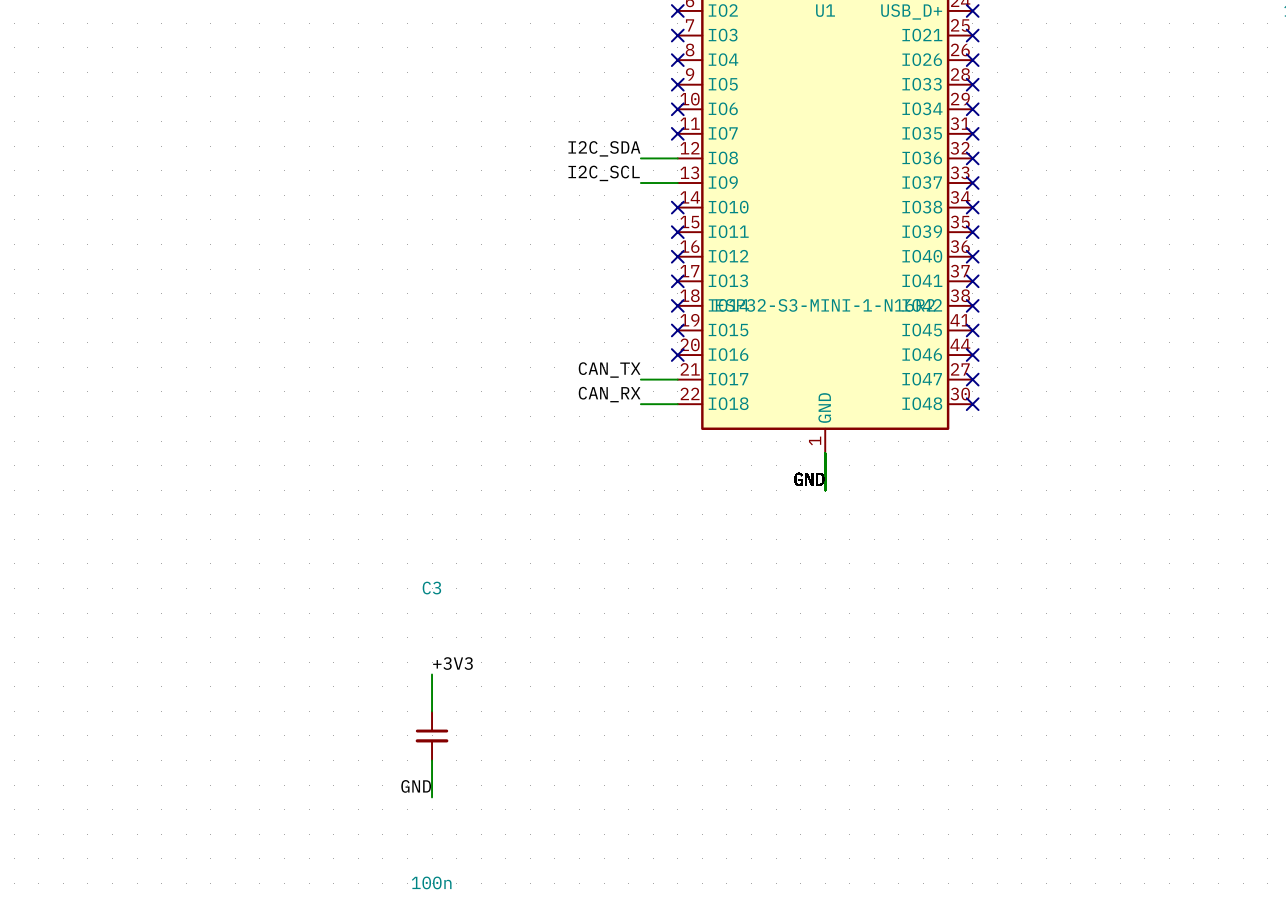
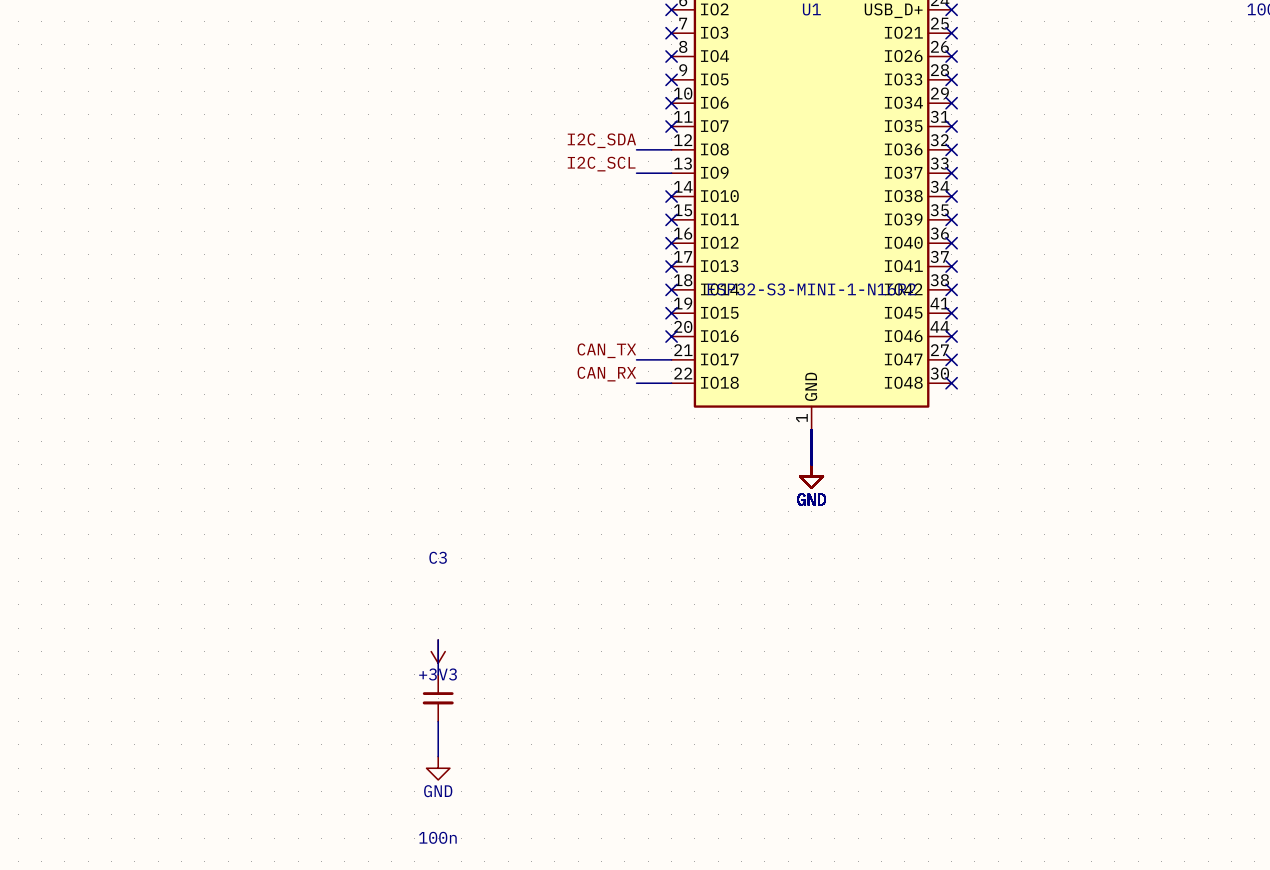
label: GND (809, 479) -> none
power symbol: none -> GND (811, 476)
label: +3V3 (452, 663) -> none
power symbol: none -> +3V3 (438, 651)
label: GND (416, 786) -> none
power symbol: none -> GND (438, 768)

